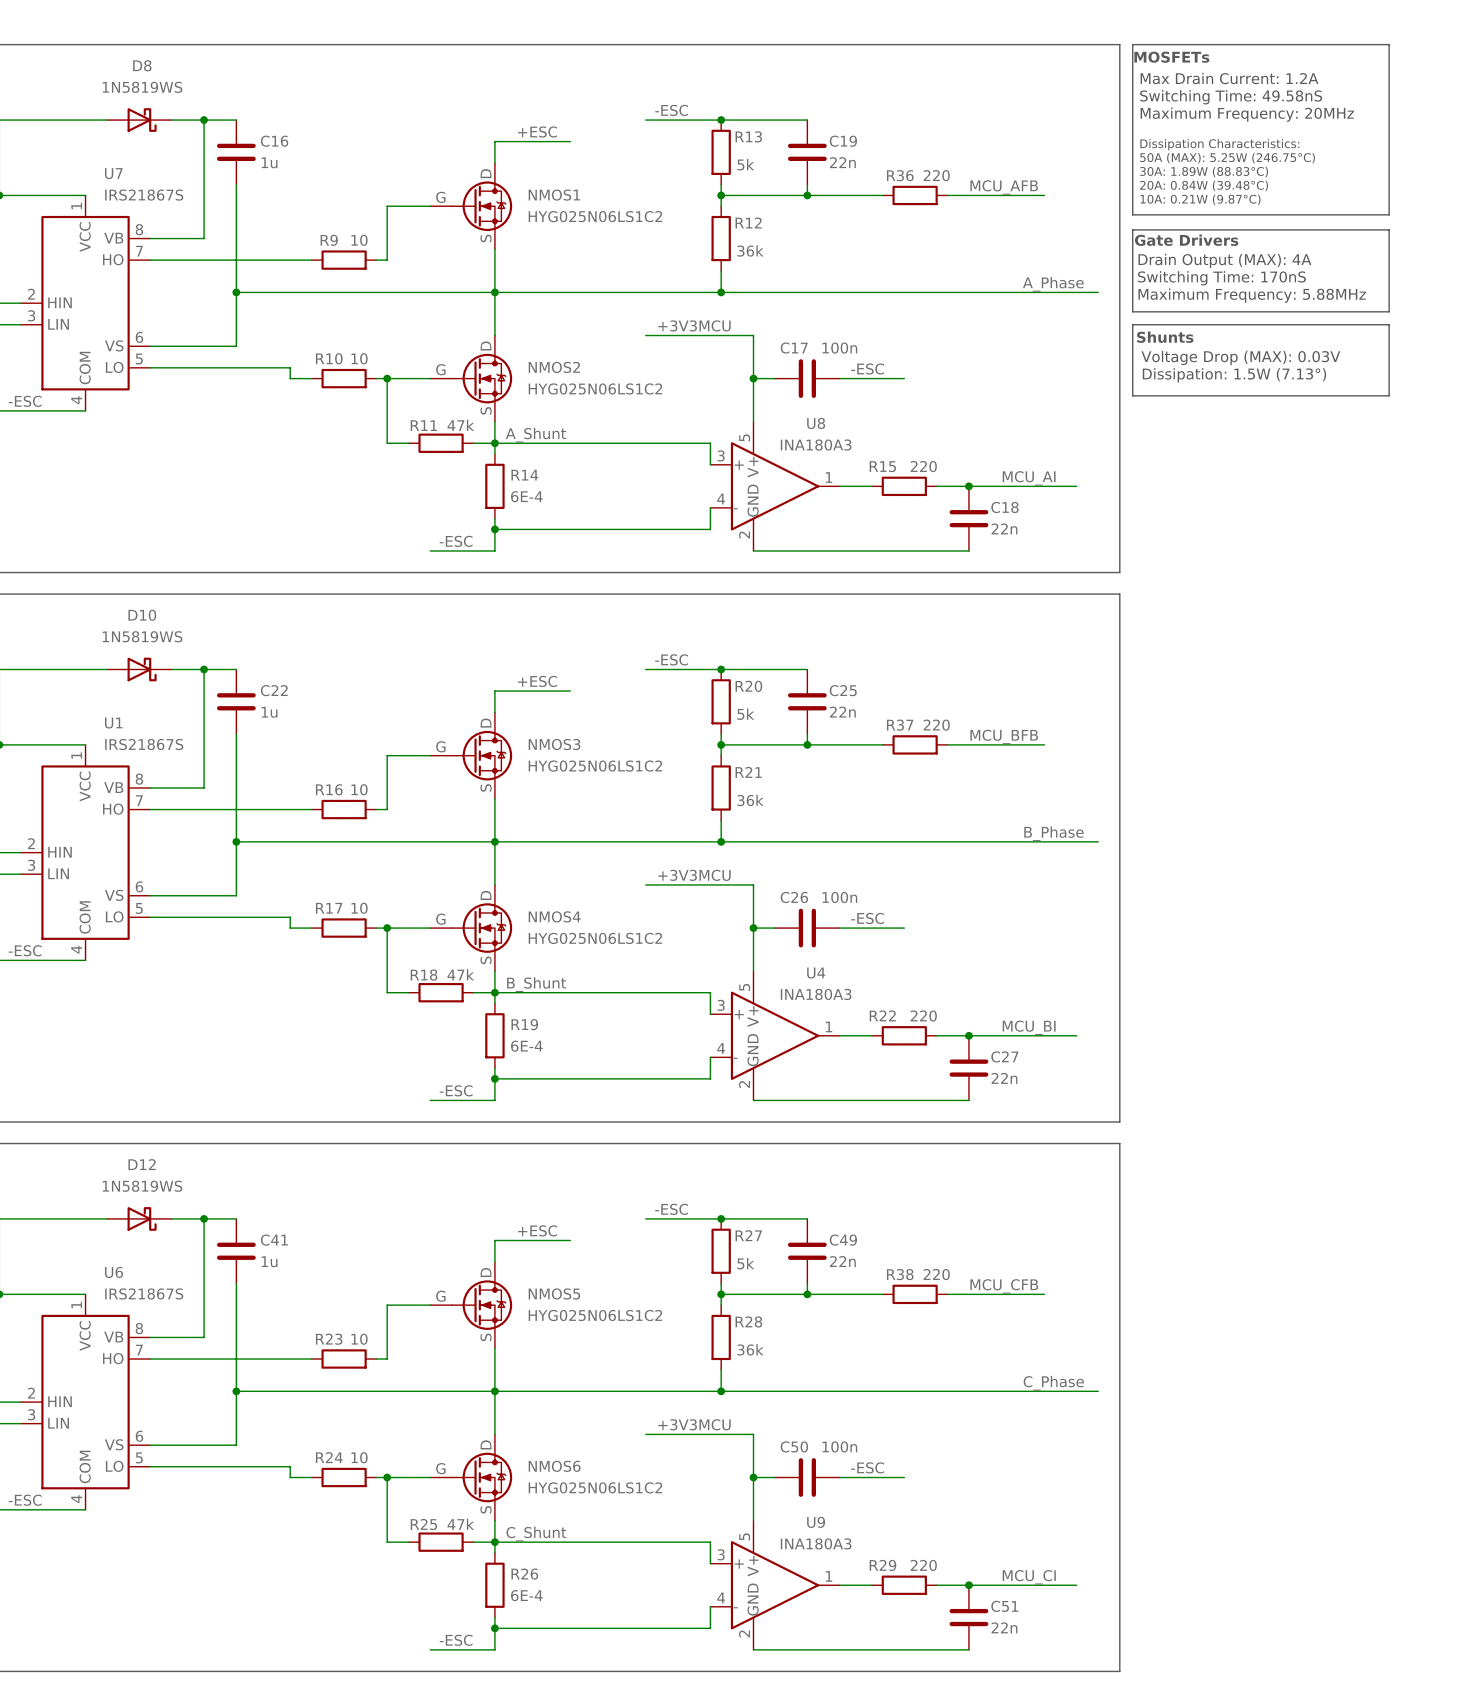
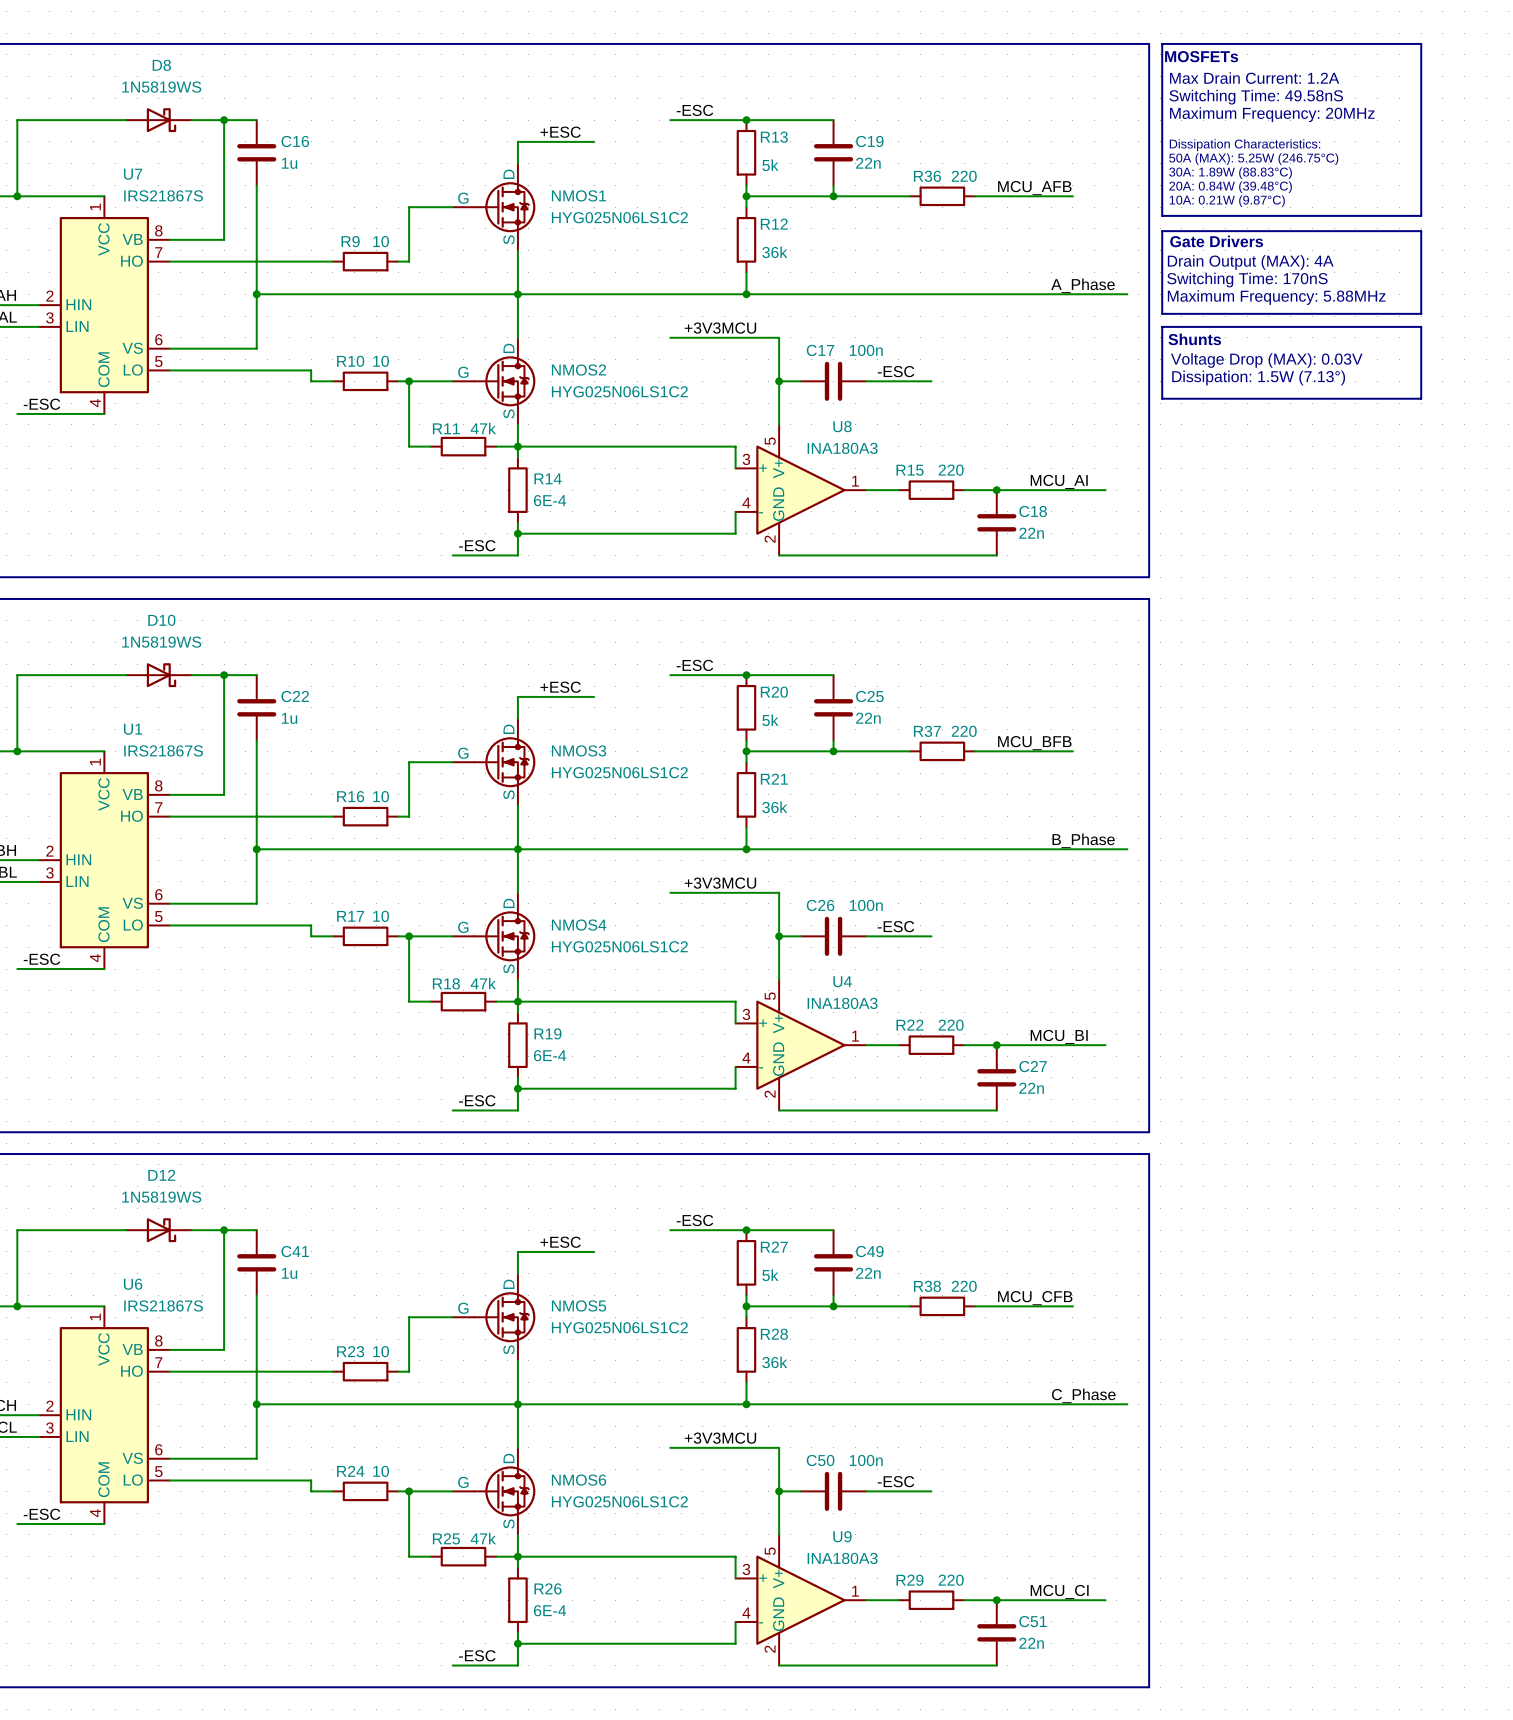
label: A_Shunt (535, 435) -> none
label: B_Shunt (536, 984) -> none
label: C_Shunt (536, 1534) -> none

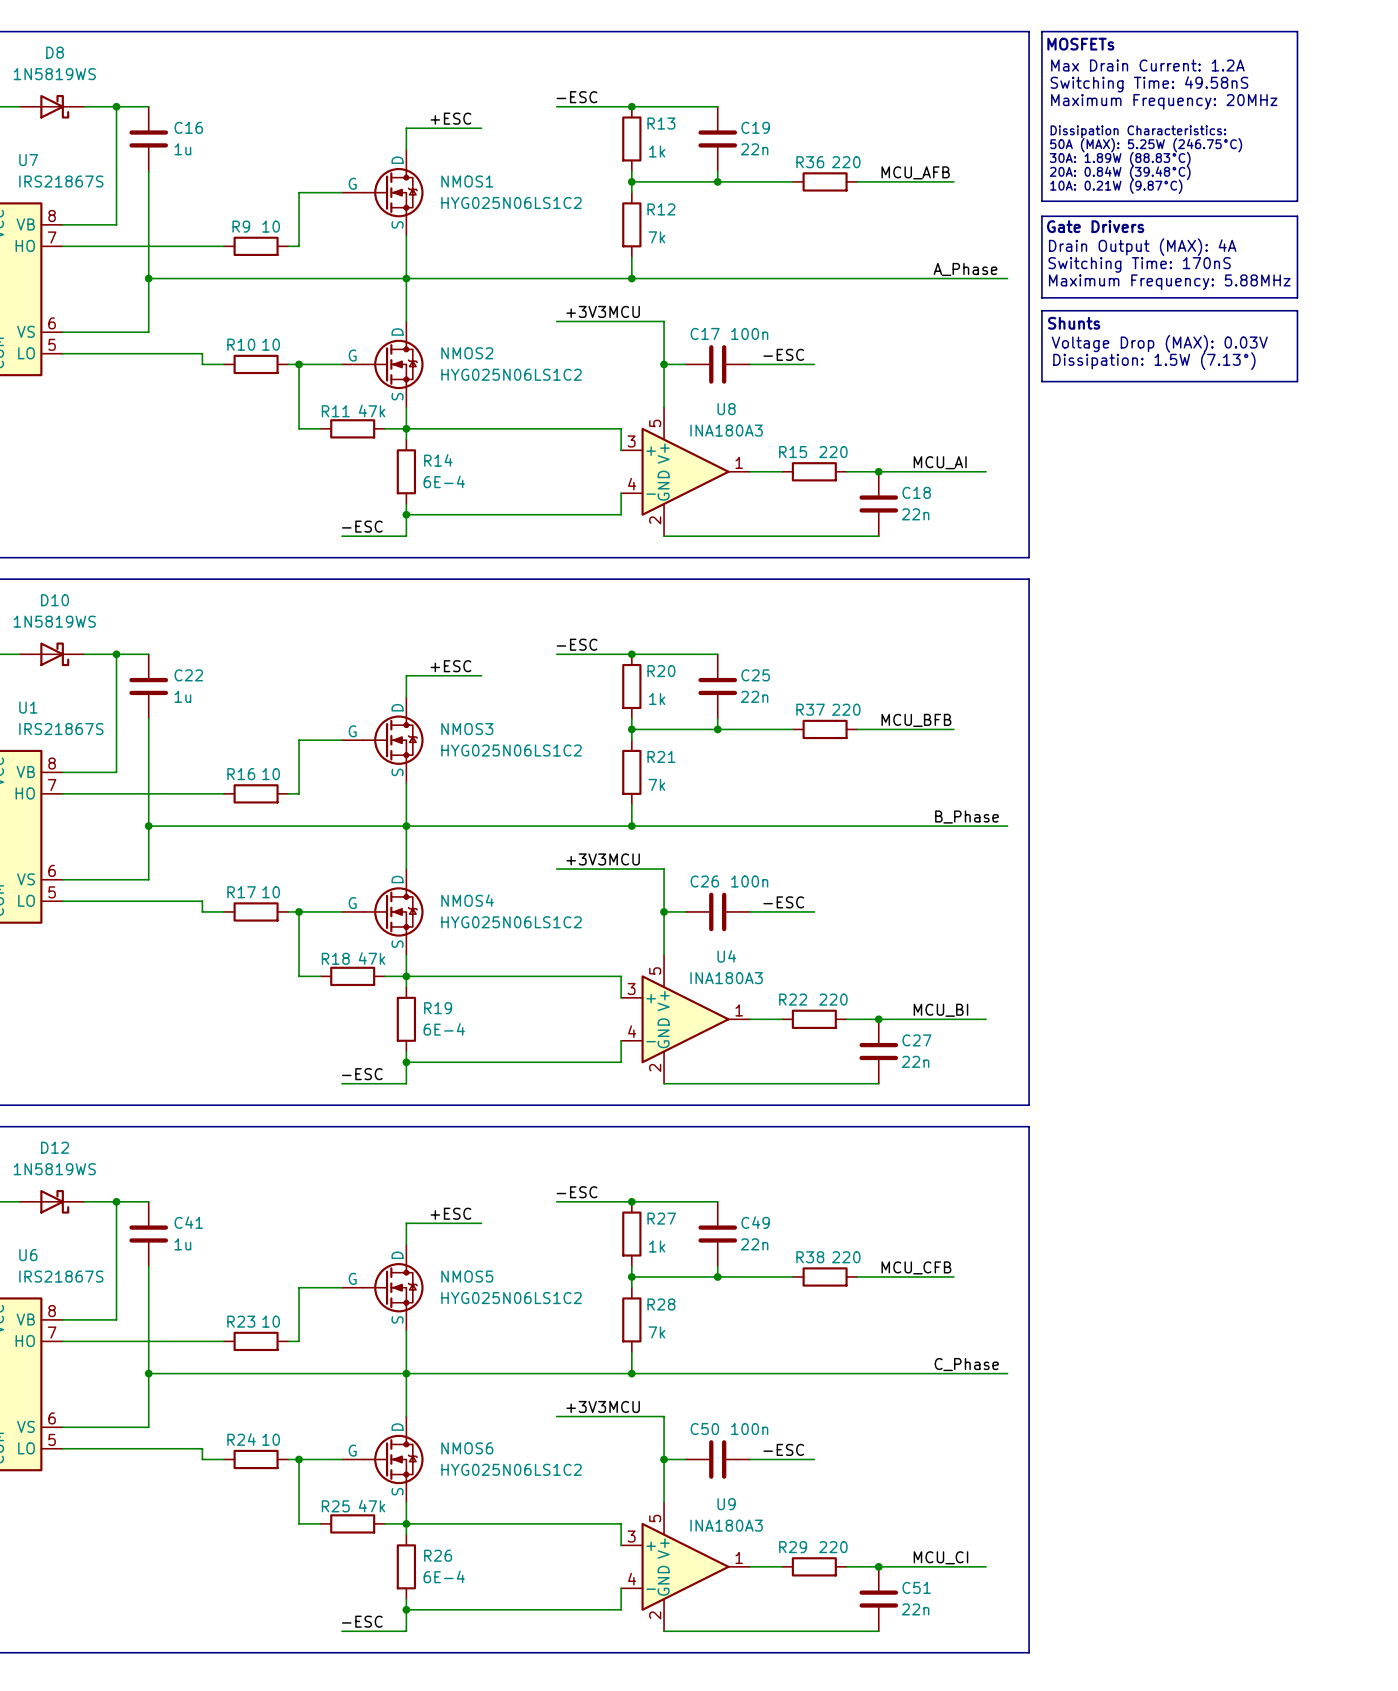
R13 value: 5k (770, 165) -> 1k (657, 151)
R12 value: 36k (774, 252) -> 7k (656, 237)
R20 value: 5k (770, 720) -> 1k (657, 698)
R21 value: 36k (774, 807) -> 7k (656, 784)
R27 value: 5k (770, 1275) -> 1k (657, 1246)
R28 value: 36k (774, 1362) -> 7k (656, 1332)

